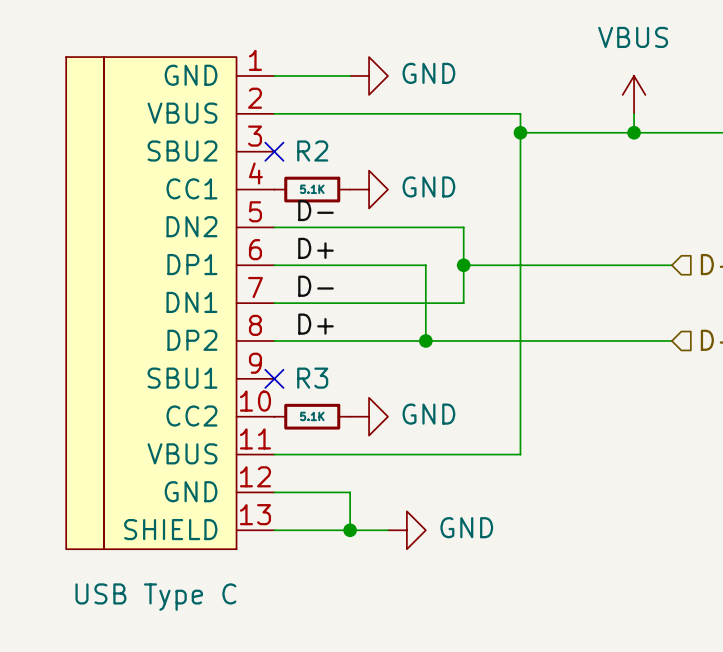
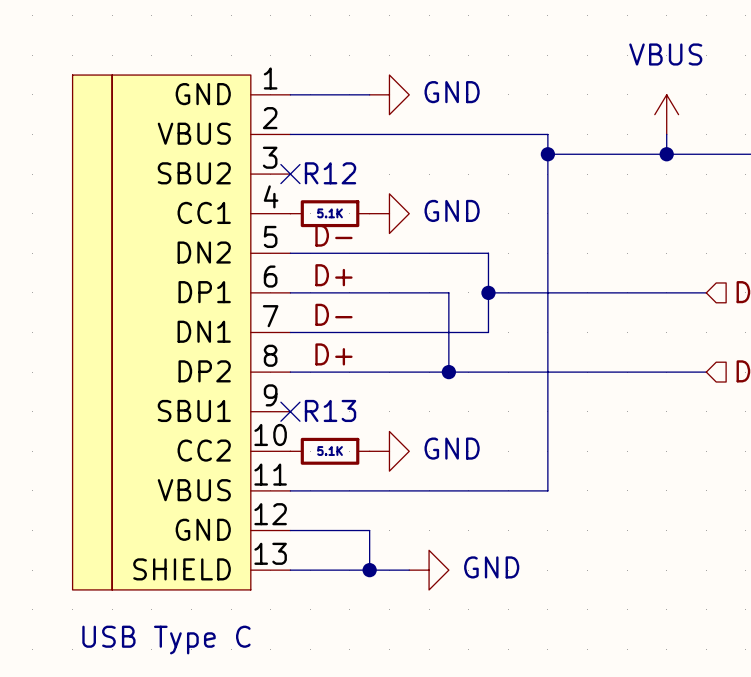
R2 name: R2 (312, 150) -> R12 (330, 173)
R3 name: R3 (312, 378) -> R13 (330, 410)

